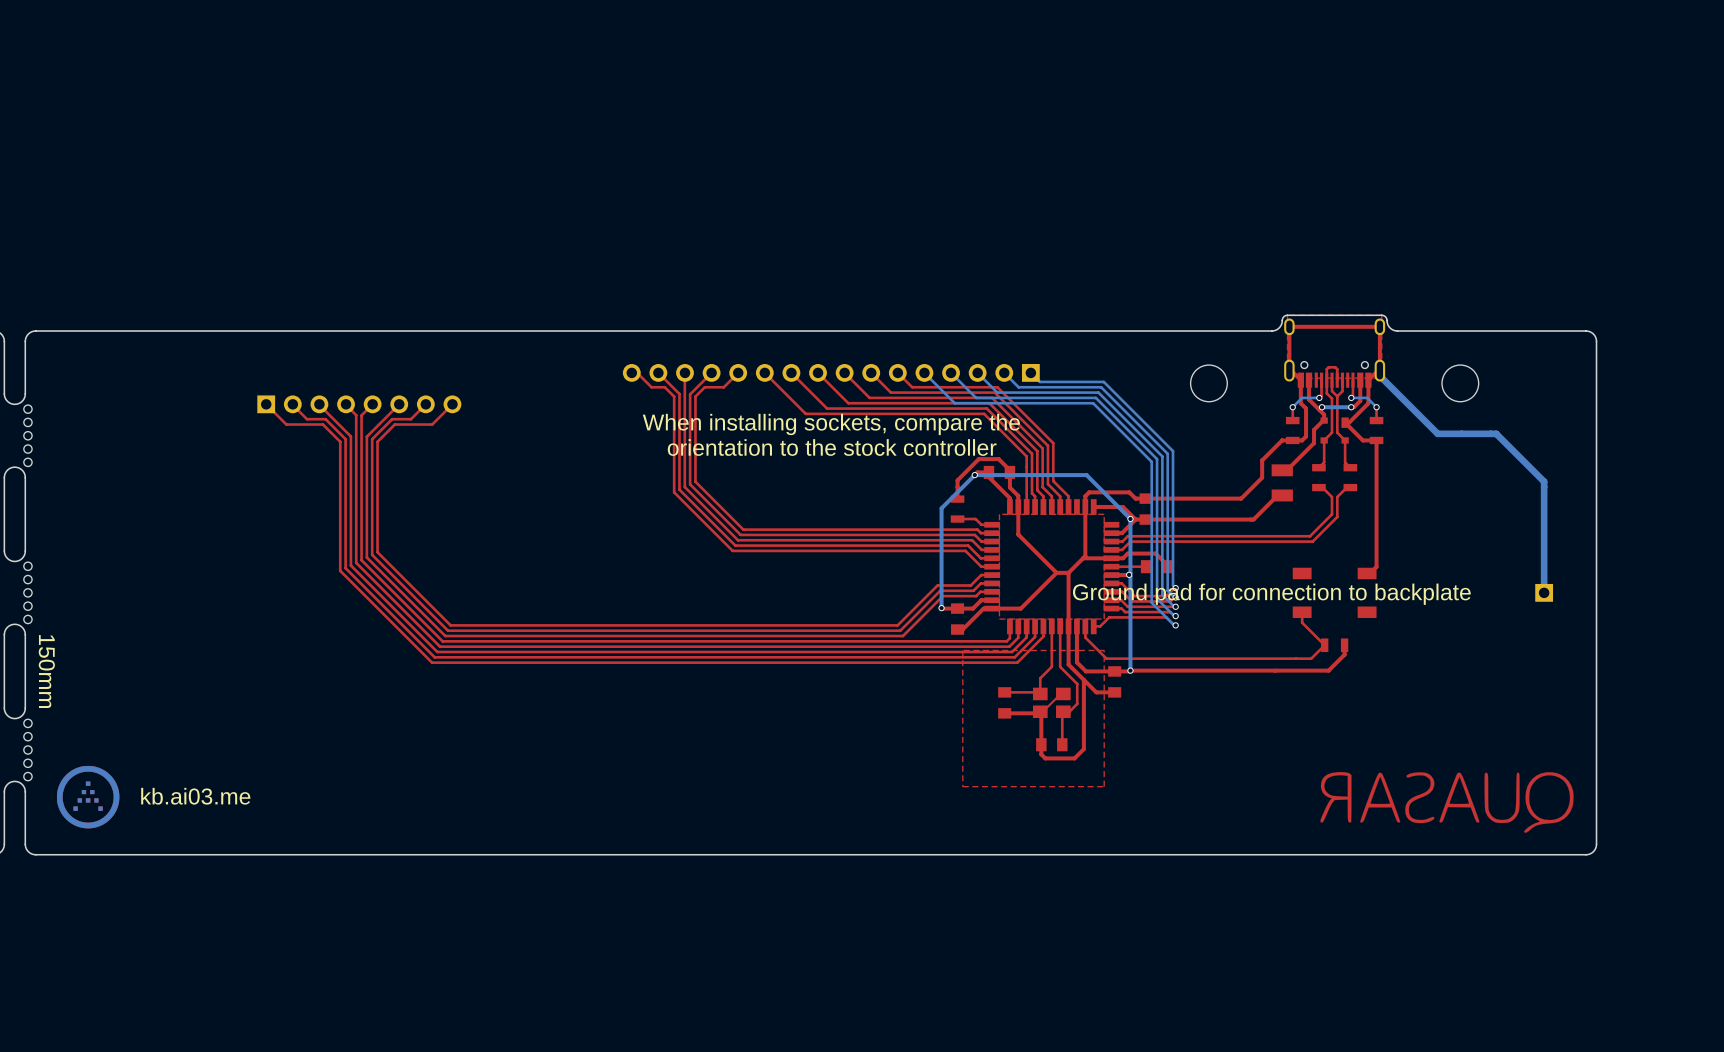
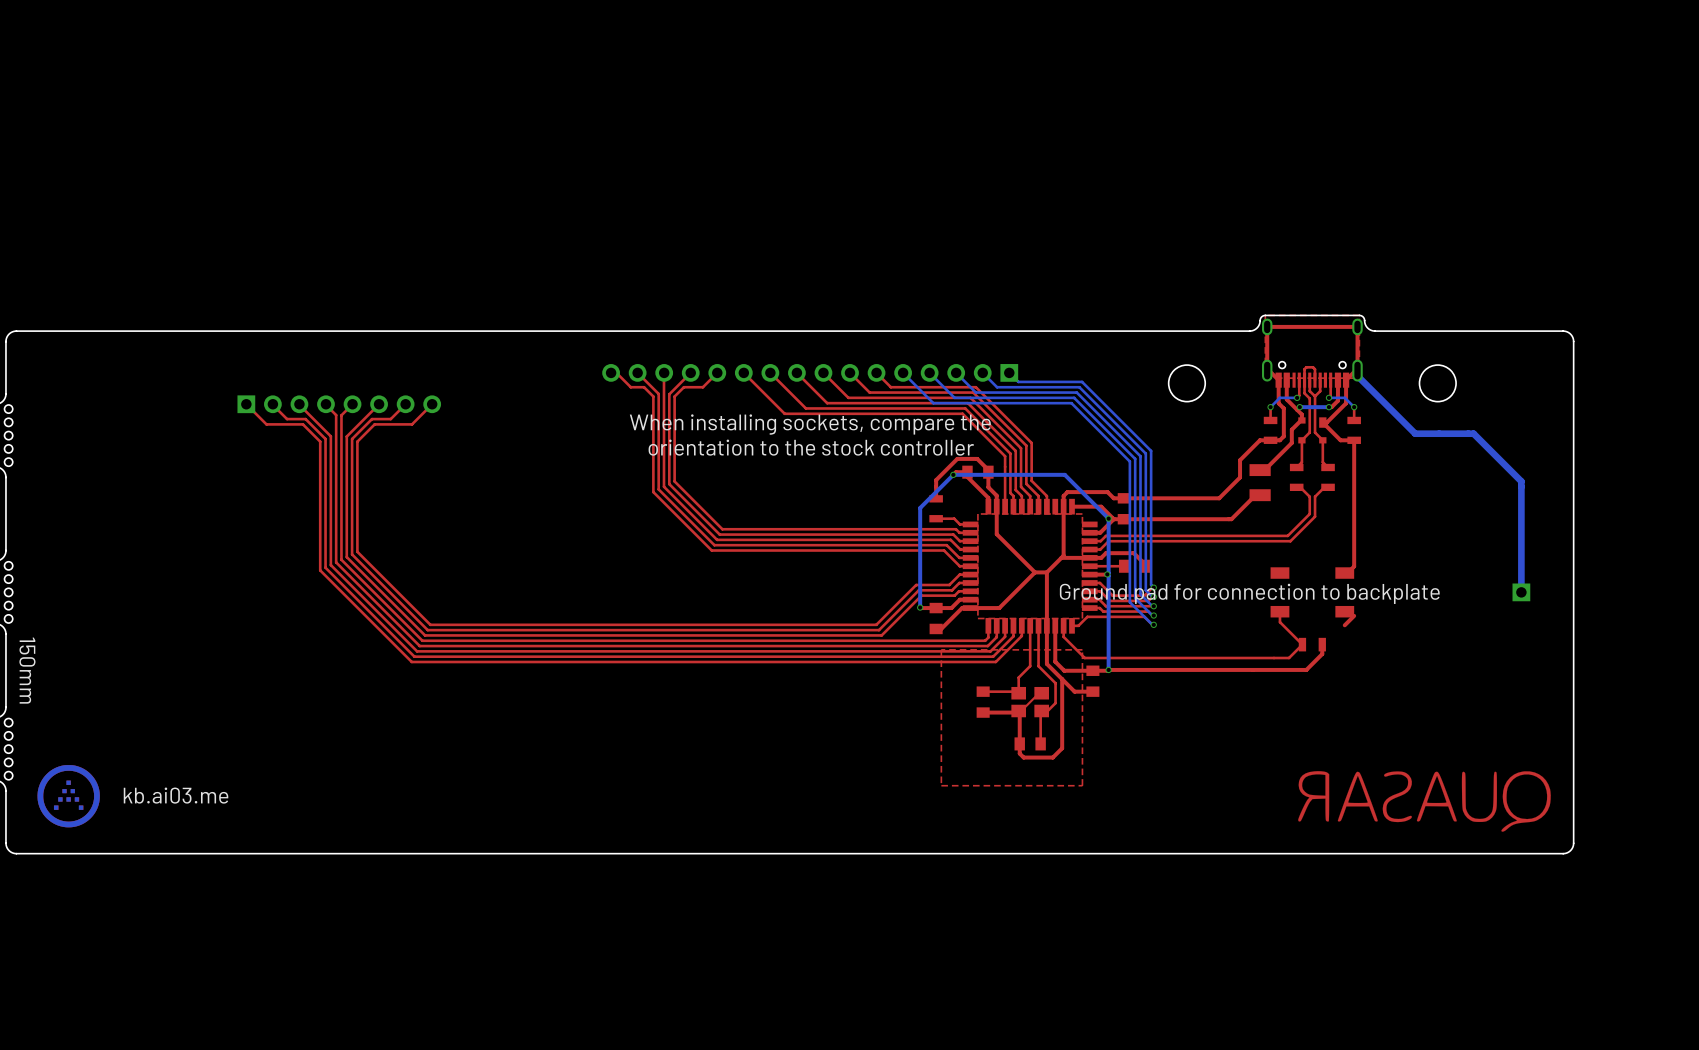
top track: none -> (1354, 615) (1344, 625)

